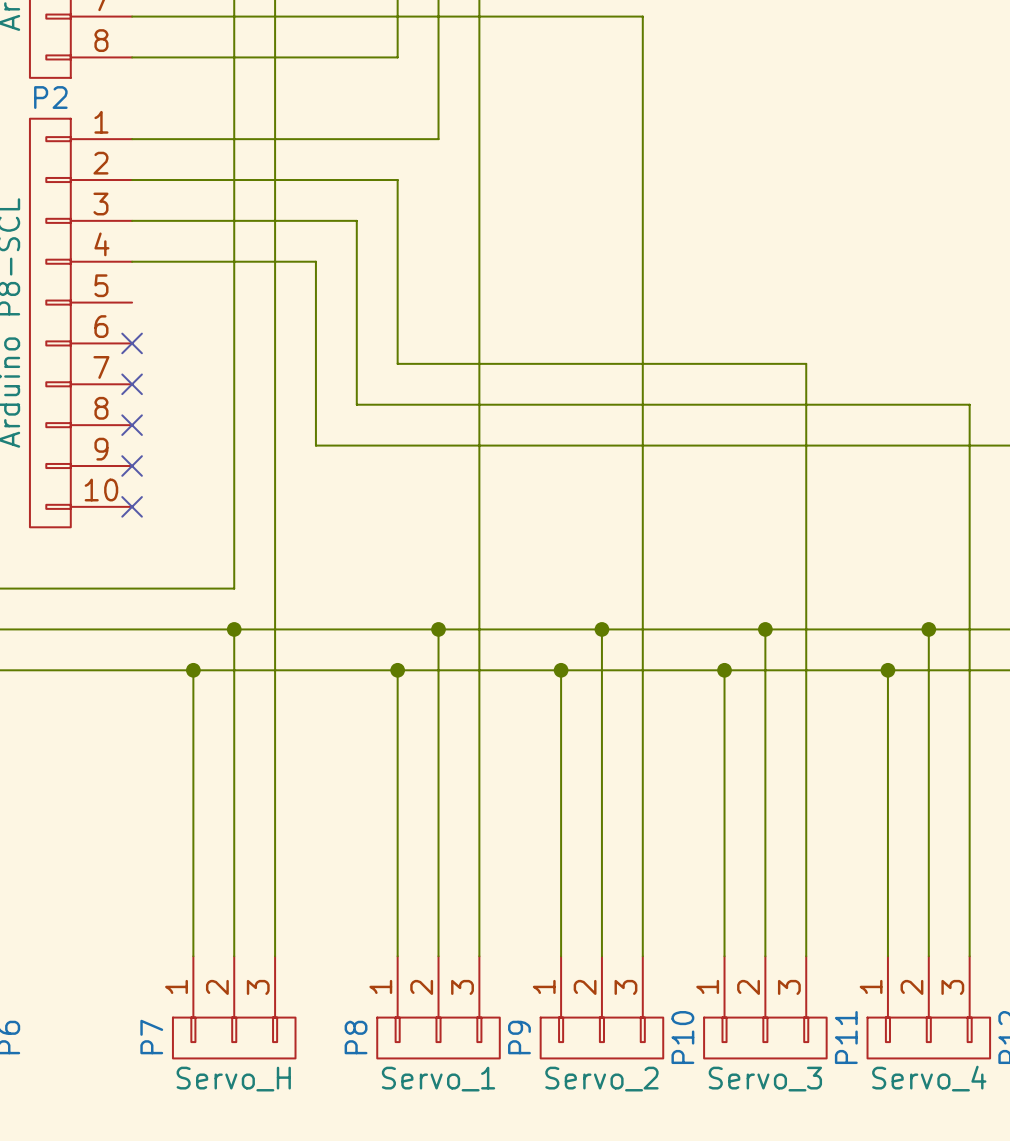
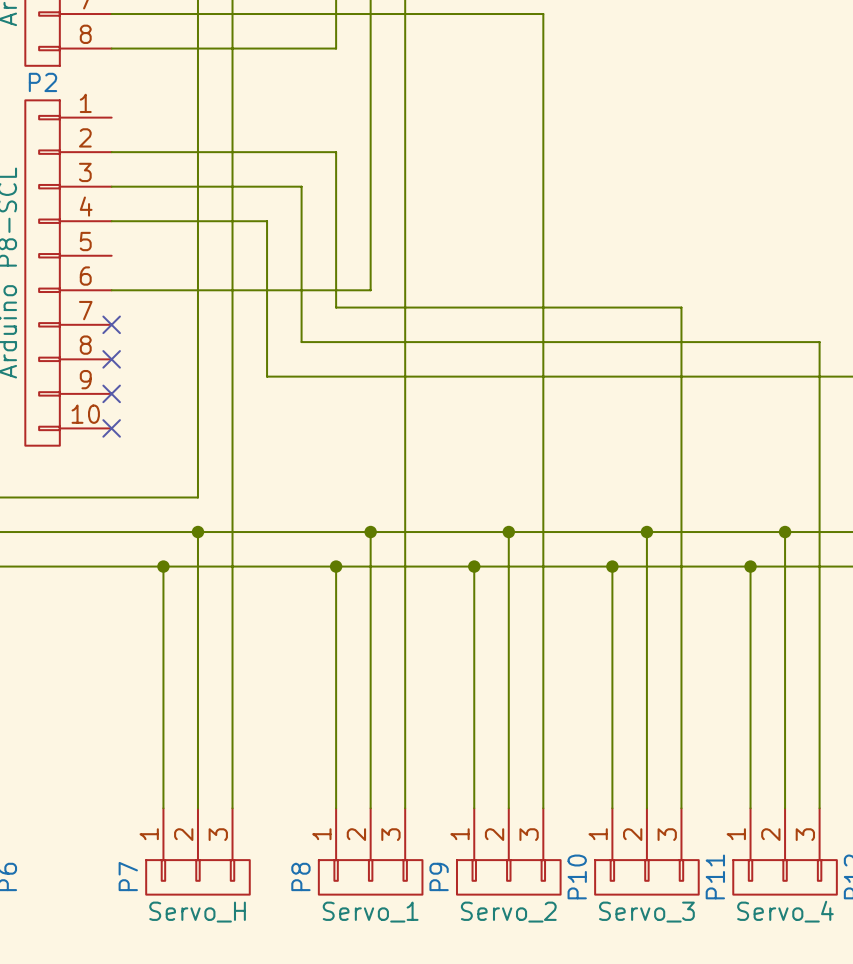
wire: (132, 139) (438, 139) -> (111, 290) (370, 290) (370, 117)
no-connect mark: (132, 343) -> none

